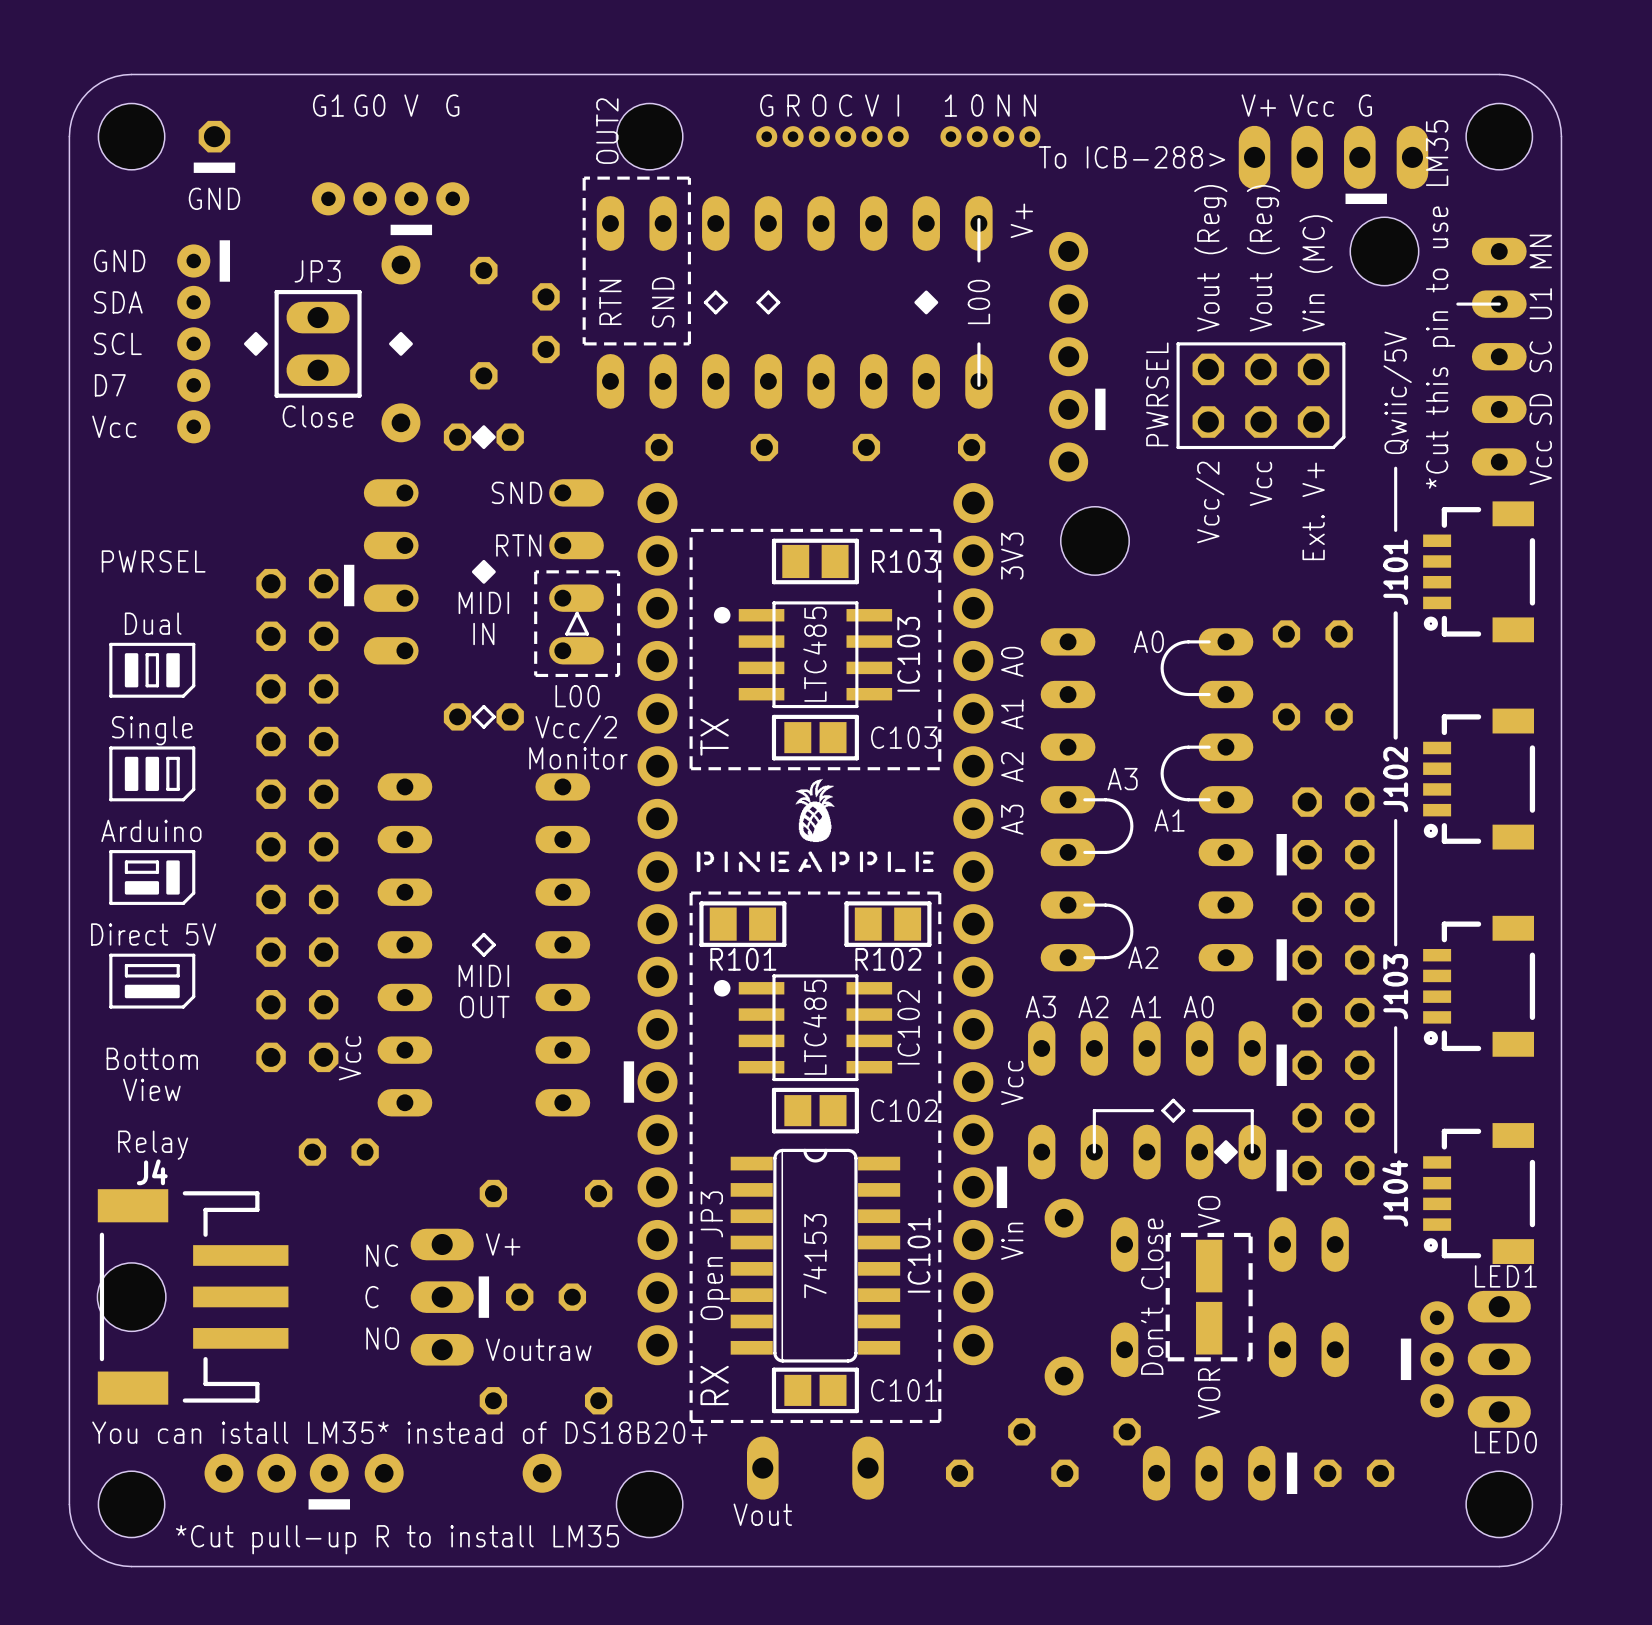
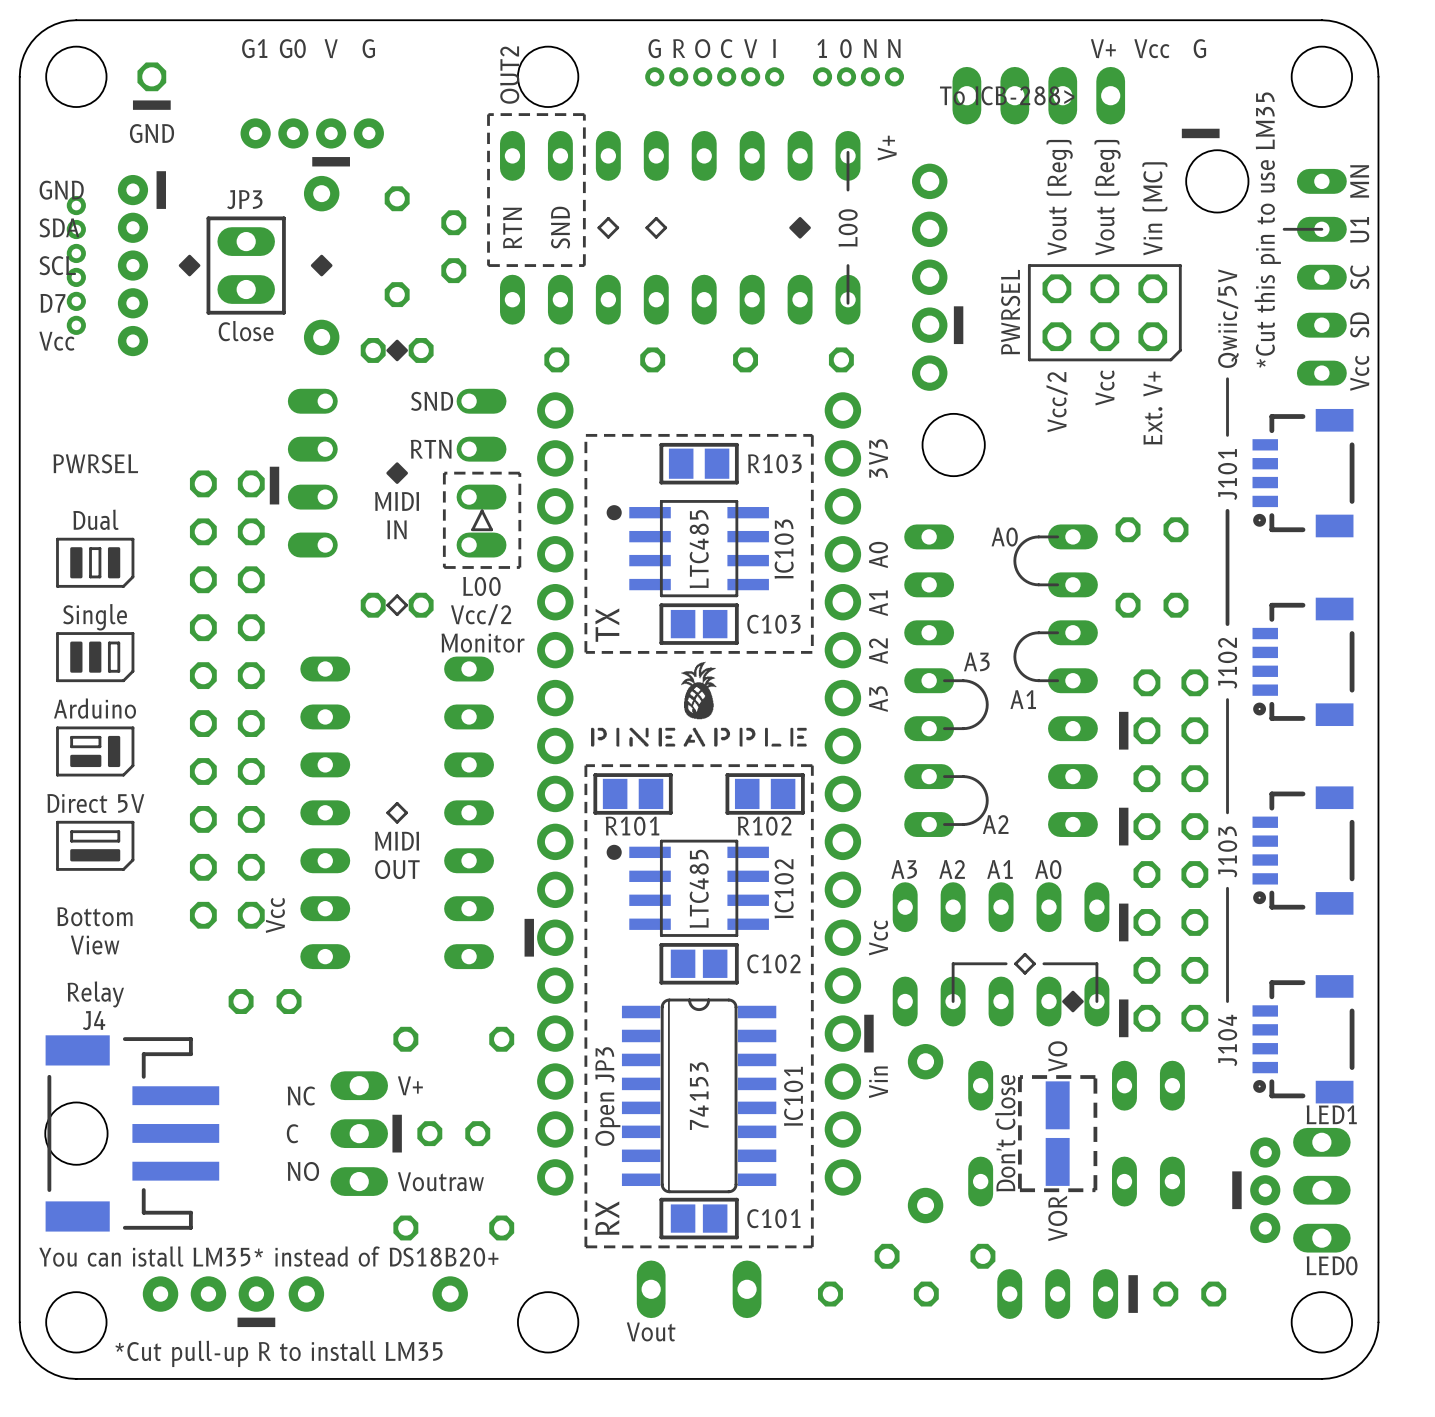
part position: (1333, 157) -> (1038, 95)
part: none -> (76, 265)

